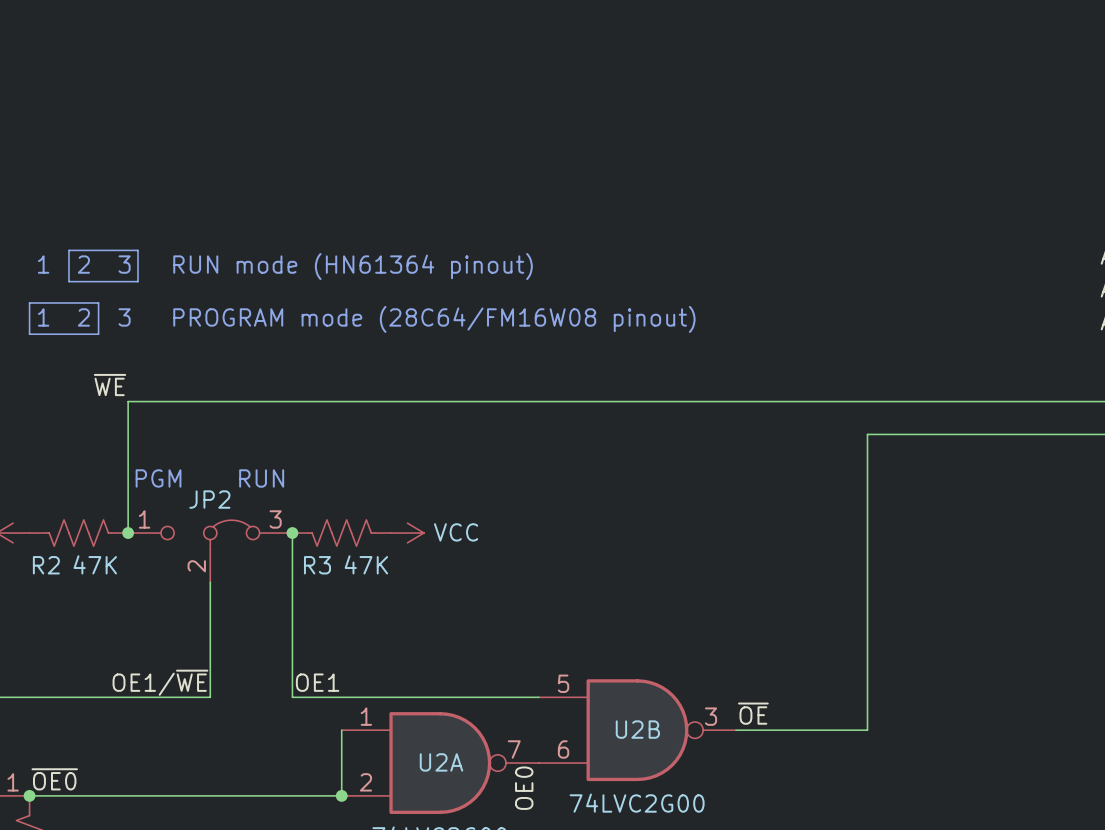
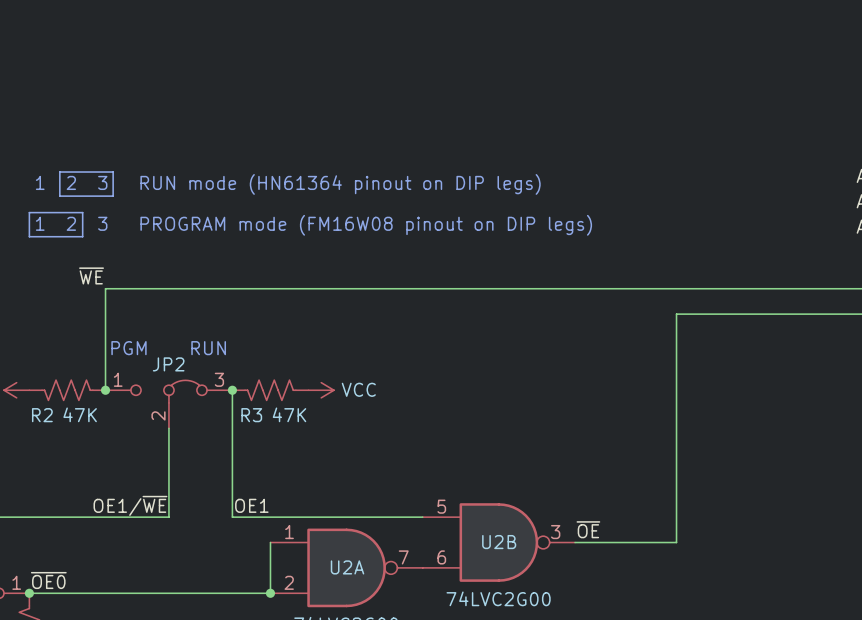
text: 1 2 3 RUN mode (HN61364 pinout) (285, 266) -> 1 2 3 RUN mode (HN61364 pinout on DIP legs) (288, 184)
text: 1 2 3 PROGRAM mode (28C64/FM16W08 pinout) (366, 319) -> 1 2 3 PROGRAM mode (FM16W08 pinout on DIP legs) (313, 225)
label: OE0 (524, 788) -> none

